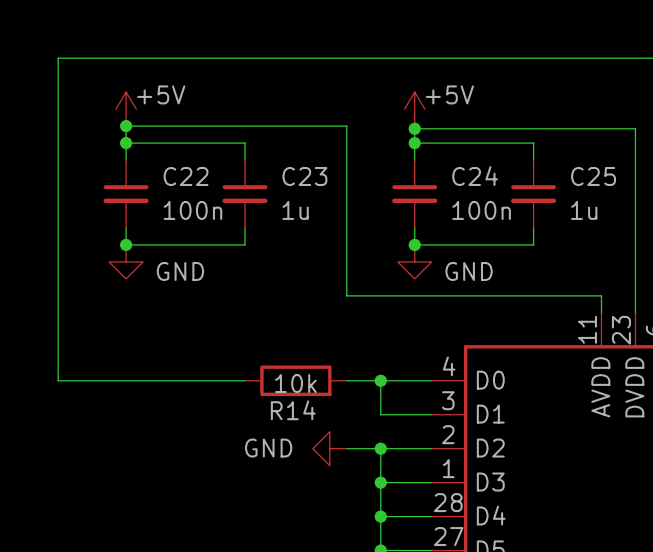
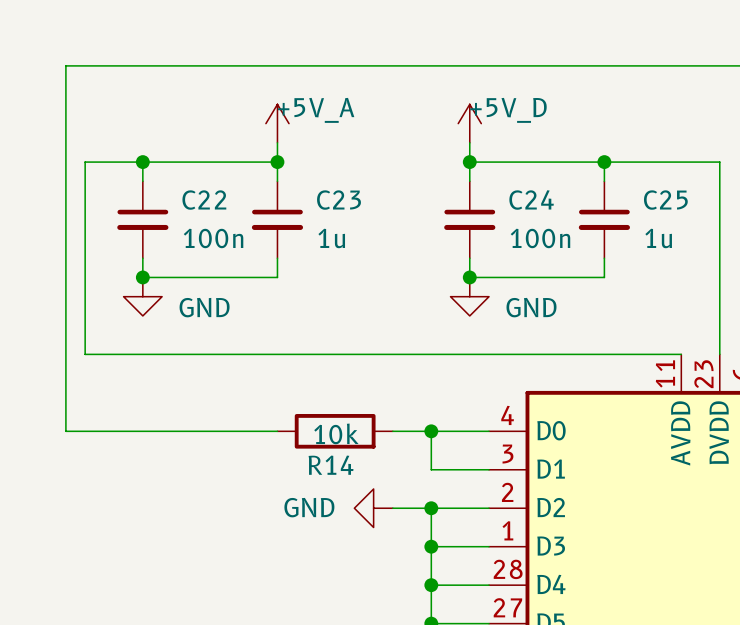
power symbol: +5V (126, 109) -> none
power symbol: none -> +5V_A (277, 123)
power symbol: +5V (414, 109) -> +5V_D (469, 123)
junction: (126, 126) -> none
wire: none -> (277, 142) (277, 162)
wire: (414, 128) (635, 128) (635, 143) -> (604, 162) (719, 162)
junction: (414, 128) -> none
wire: (126, 143) (126, 126) (346, 126) (346, 295) (601, 295) (601, 312) -> (142, 162) (85, 162) (85, 354) (681, 354)
junction: none -> (277, 162)
junction: none -> (604, 162)

